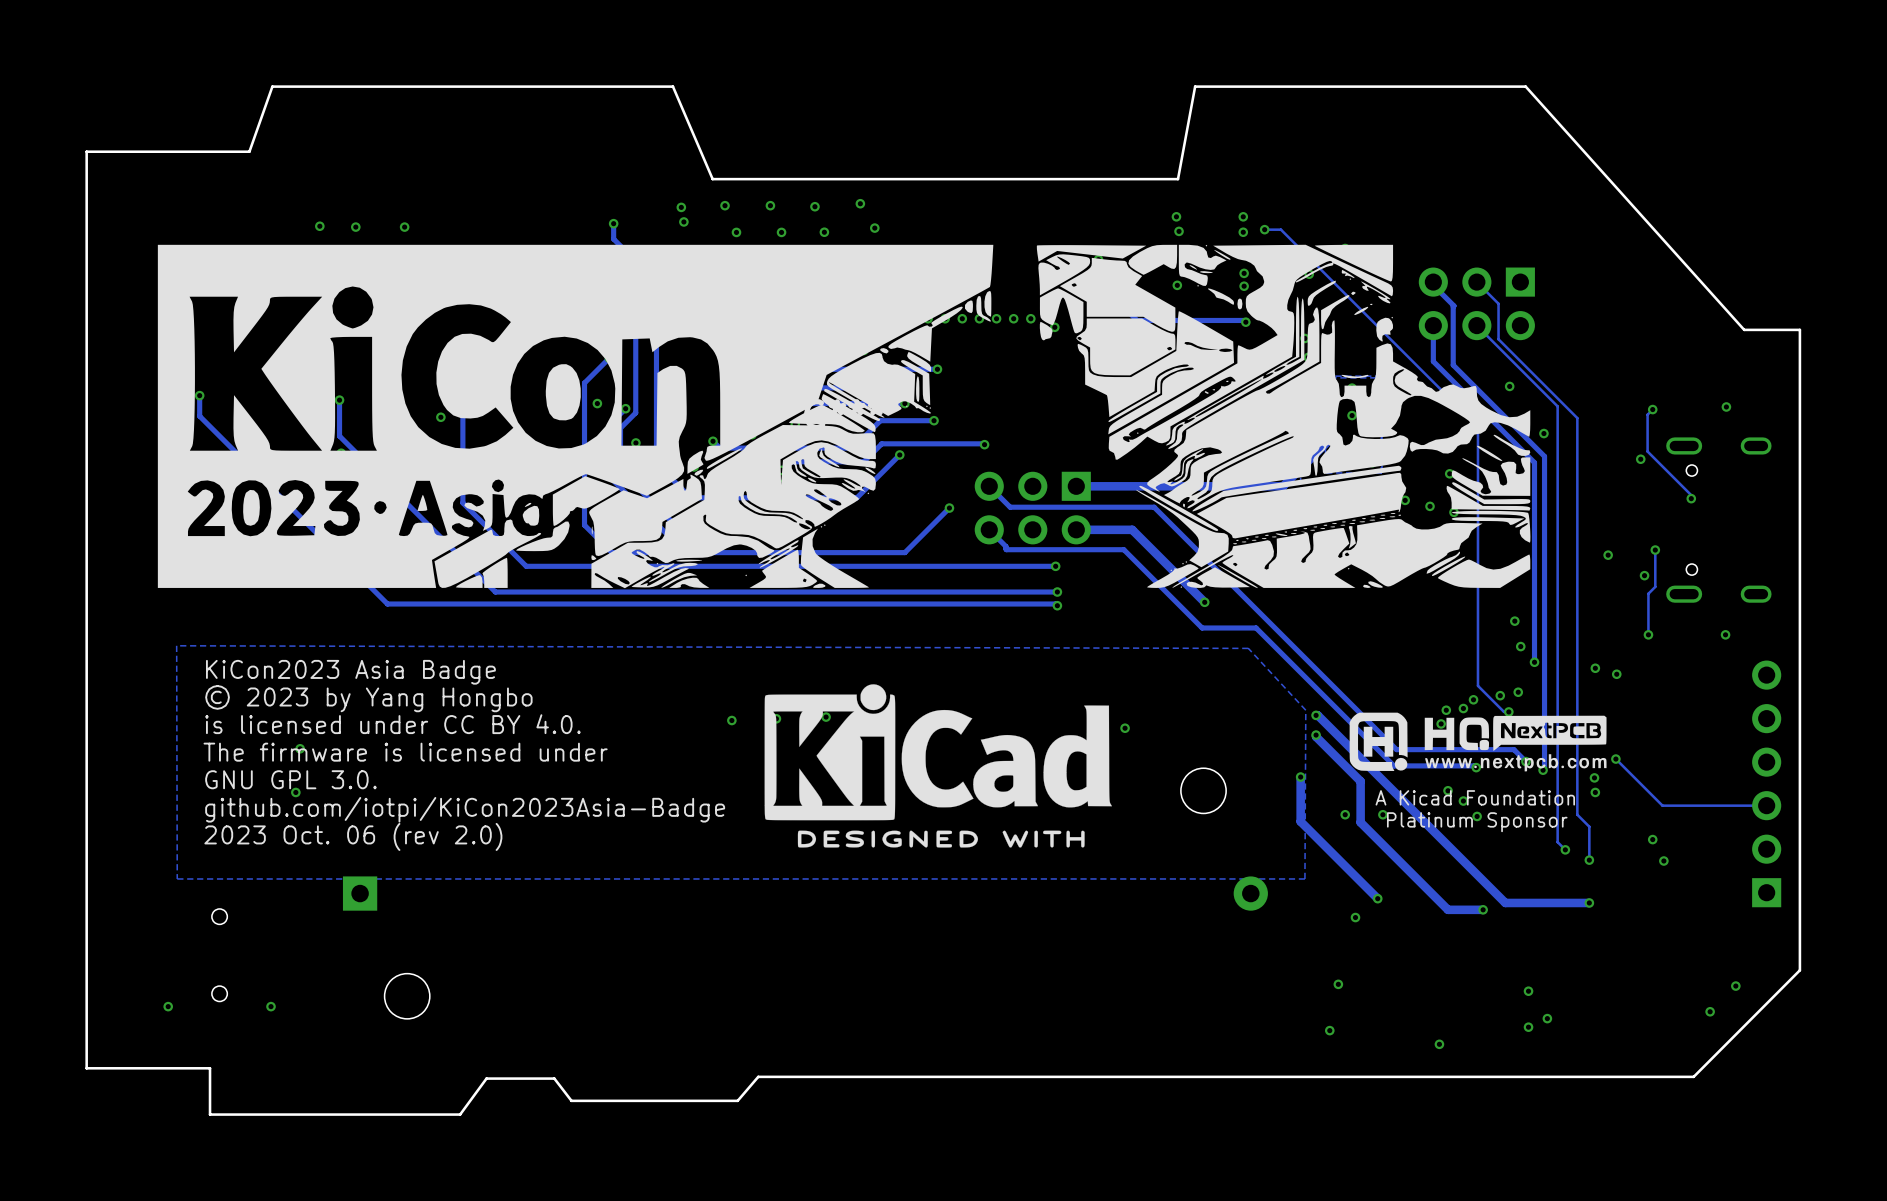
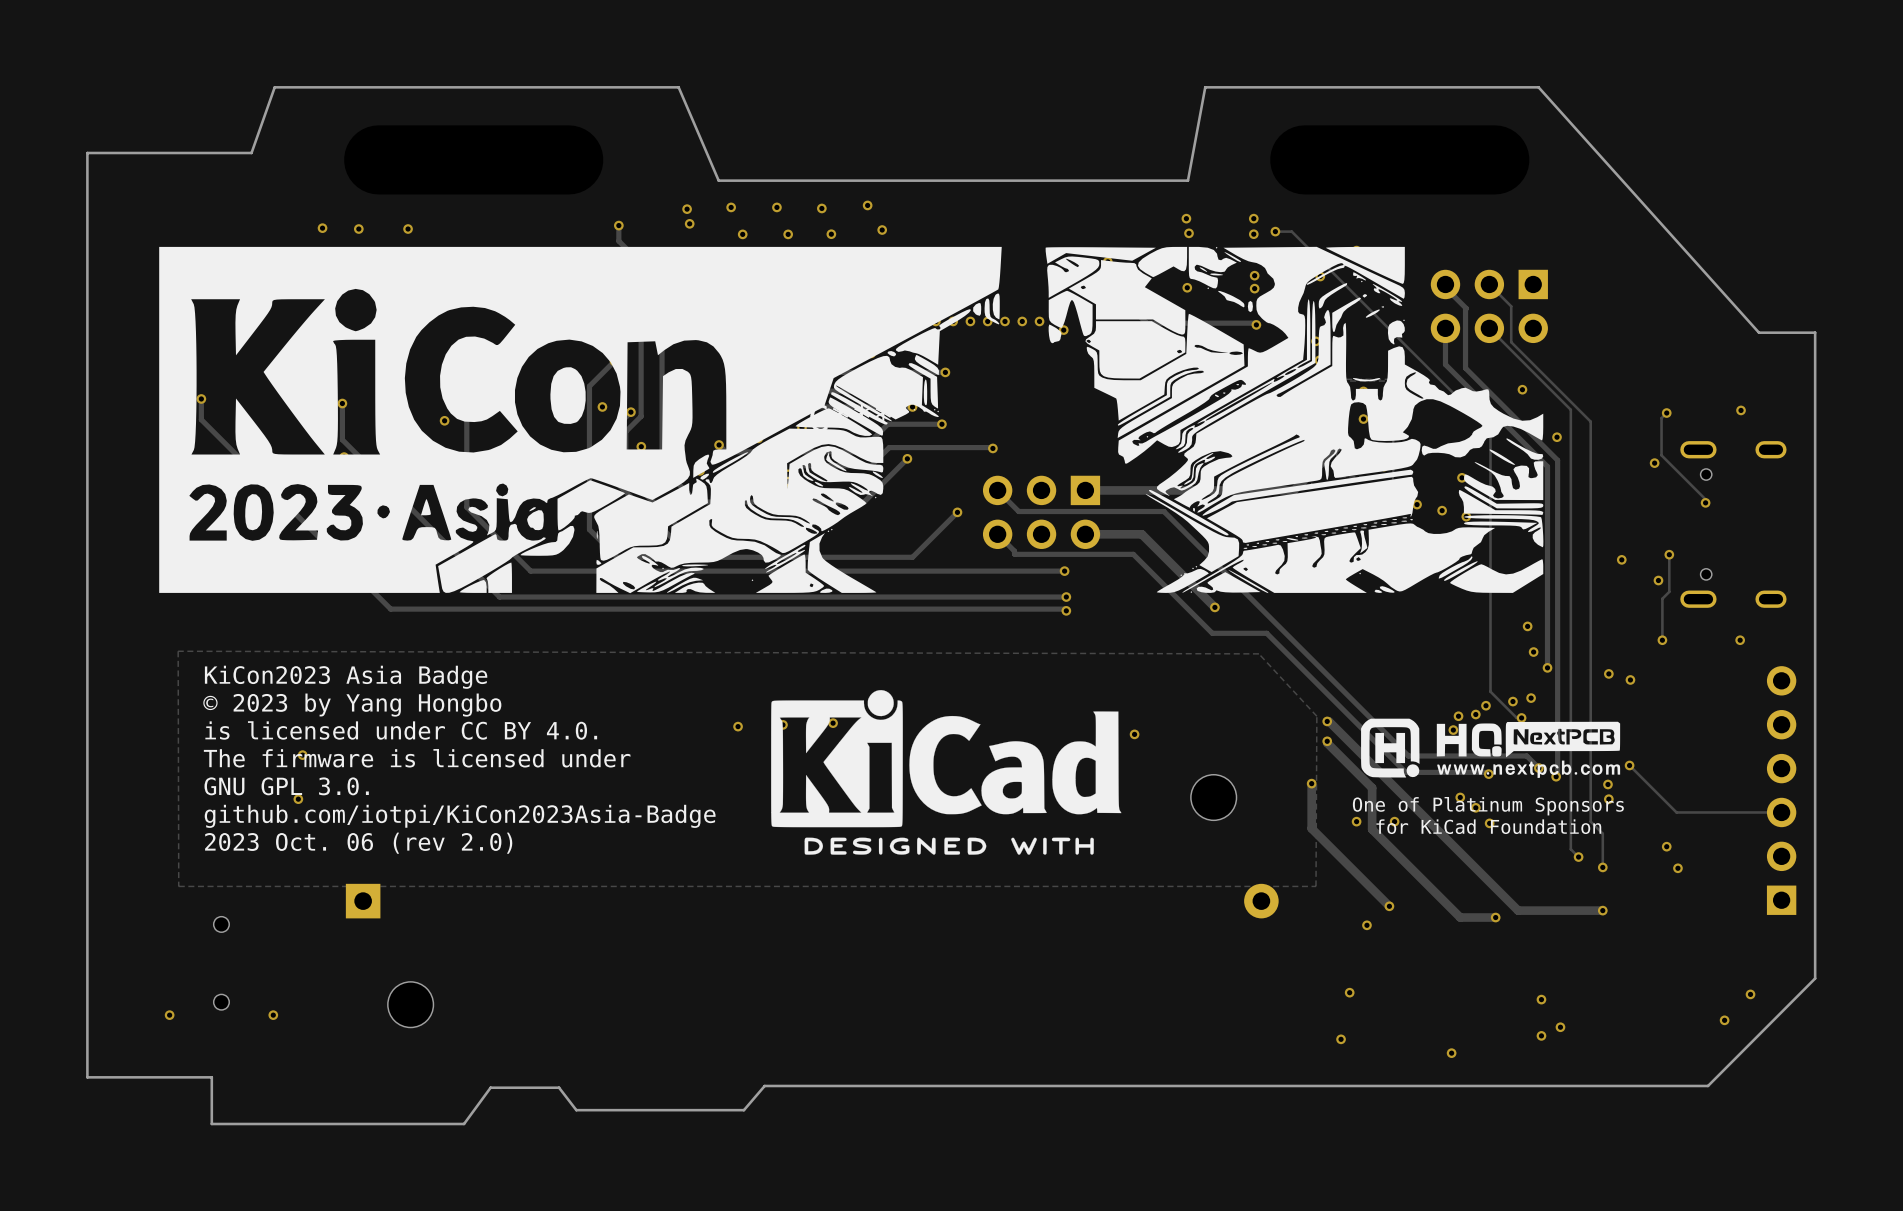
text: A Kicad Foundation (1475, 797) -> One of Platinum Sponsors (1488, 806)
text: Platinum Sponsor (1477, 822) -> for KiCad Foundation (1488, 826)

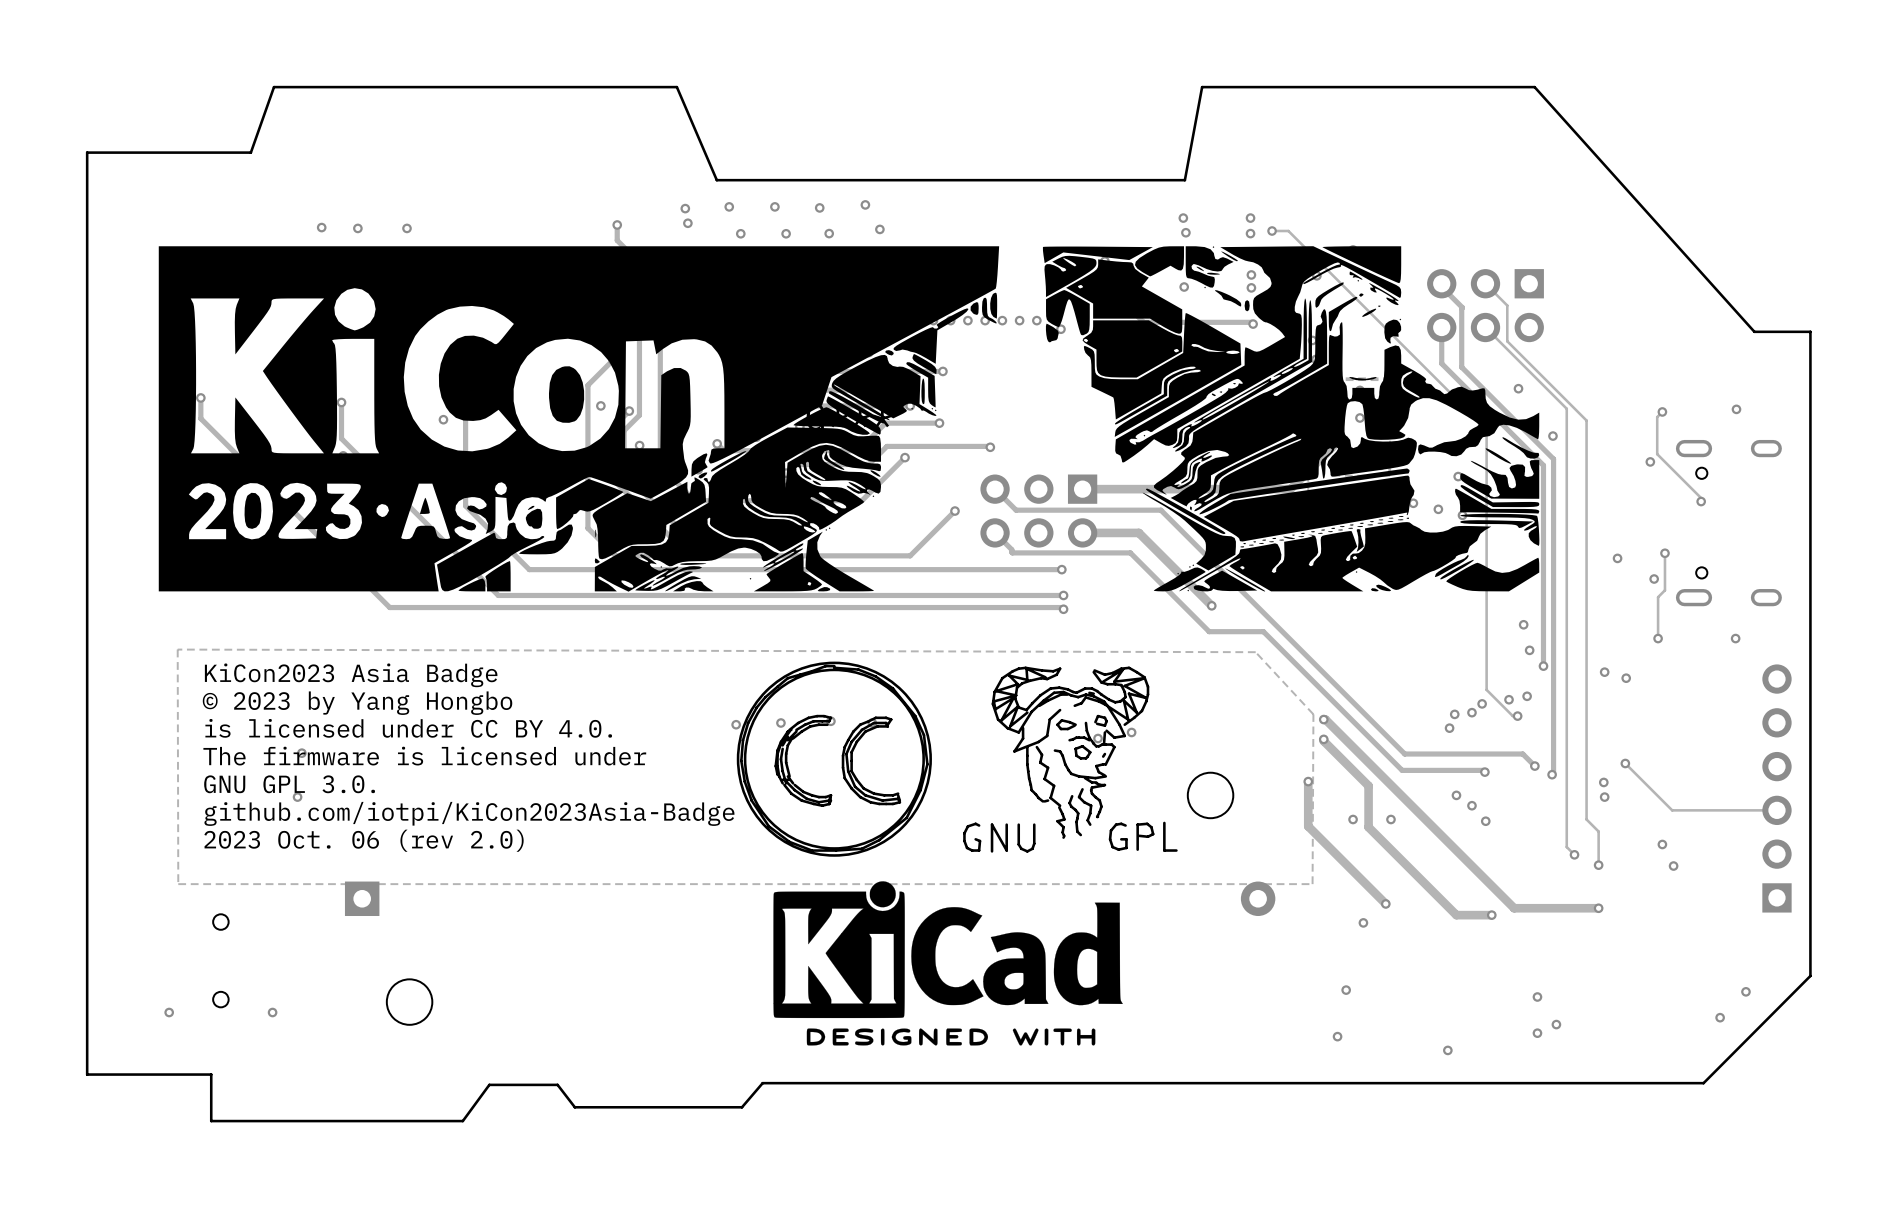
drawing: none -> [736, 661, 932, 857]
drawing: none -> [963, 666, 1178, 853]
drawing: [1361, 718, 1621, 778] -> none
drawing position: (946, 772) -> (948, 963)
text: One of Platinum Sponsors (1488, 806) -> none
text: for KiCad Foundation (1488, 826) -> none

